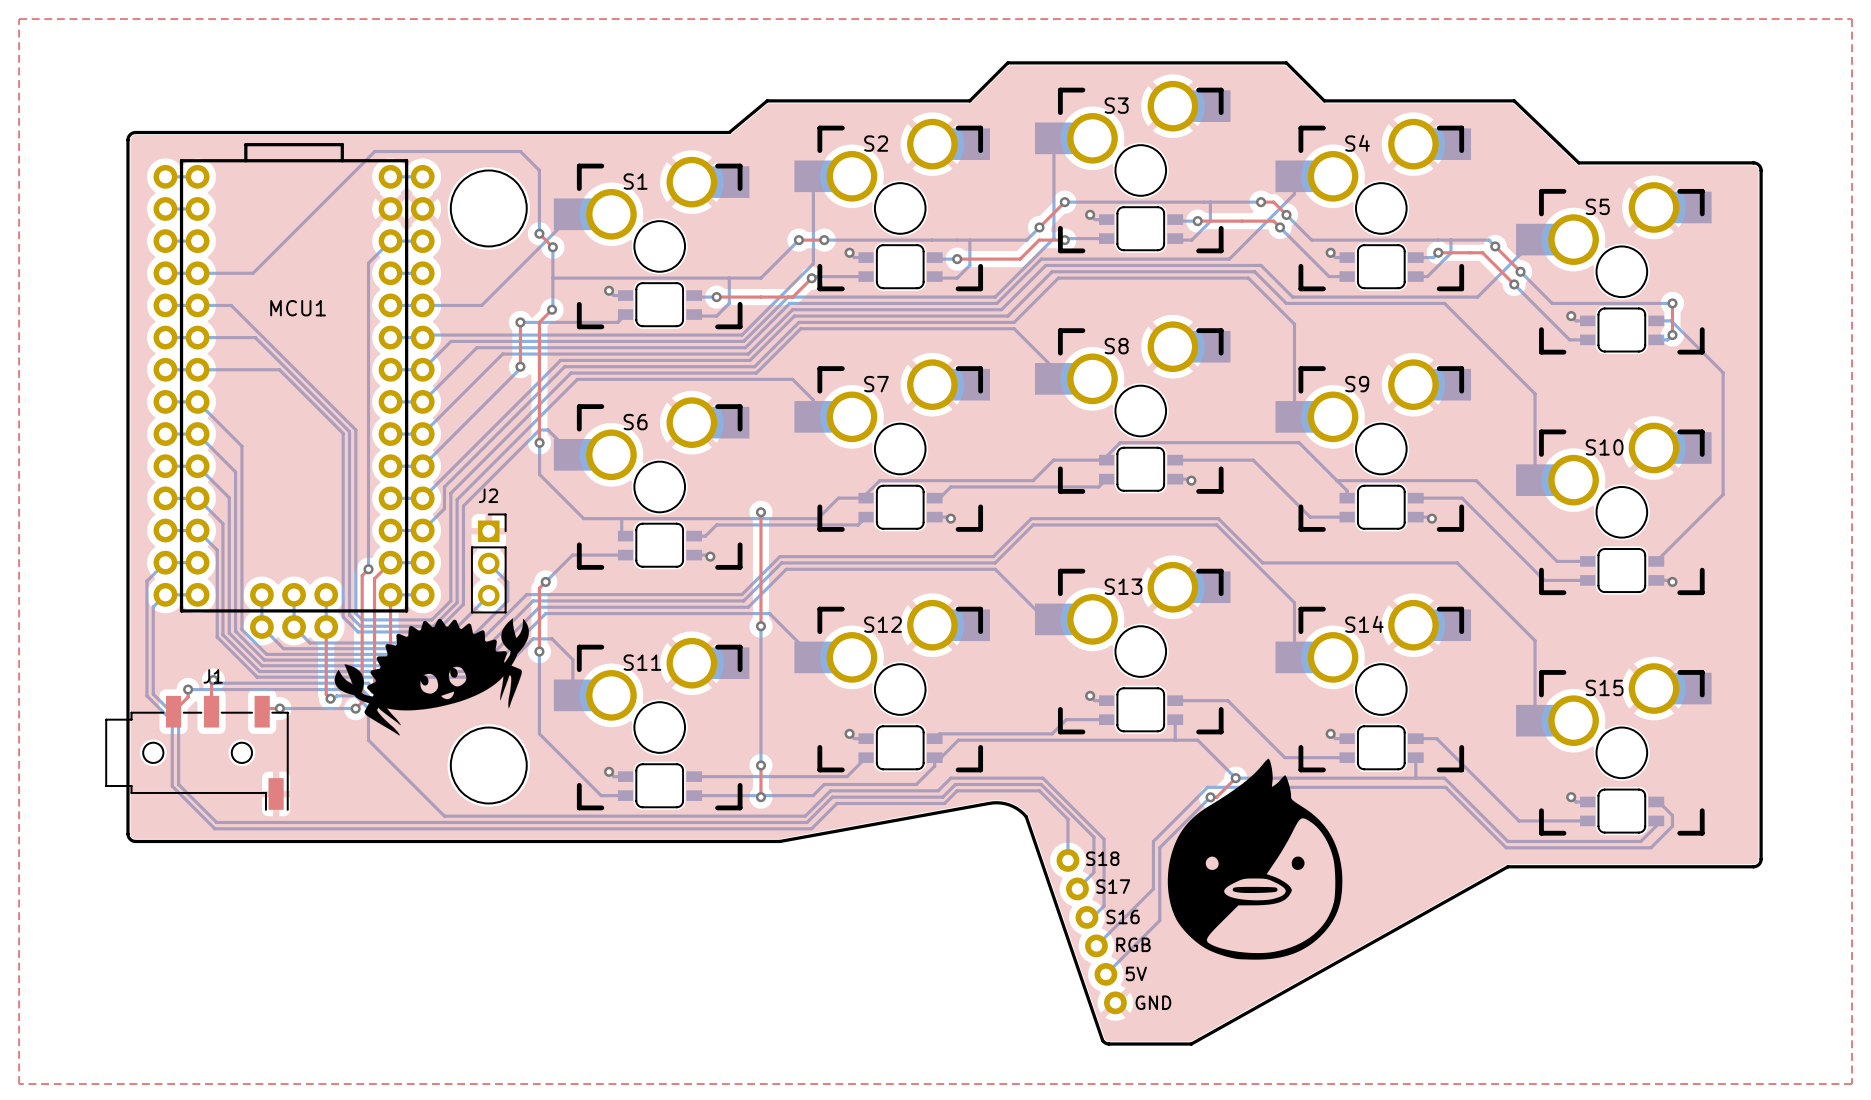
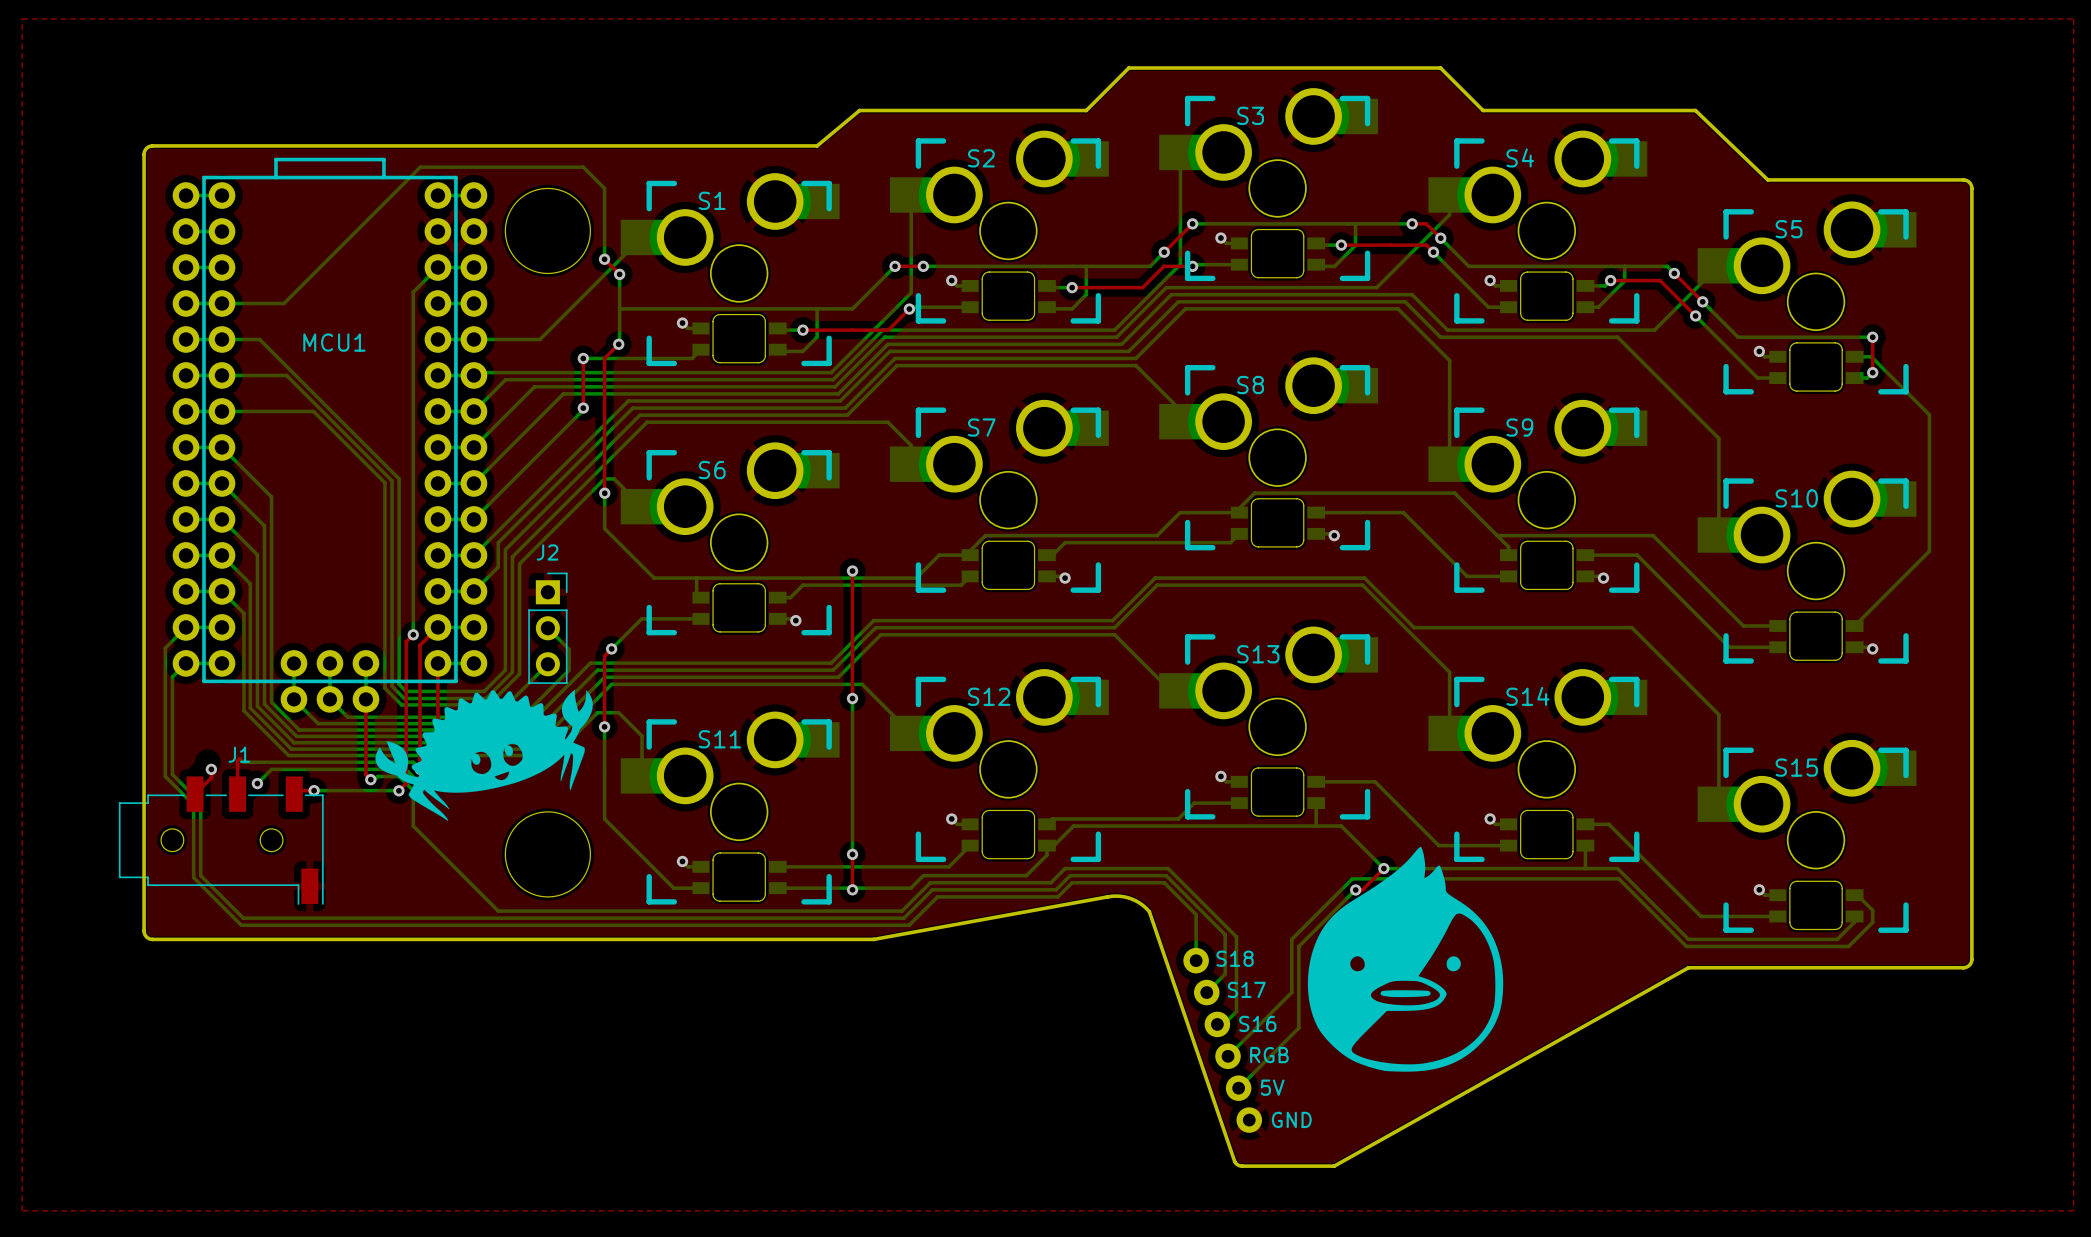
via position: (213, 680) -> (257, 783)
bottom track: (188, 689) (241, 689) -> (257, 783) (271, 769)

